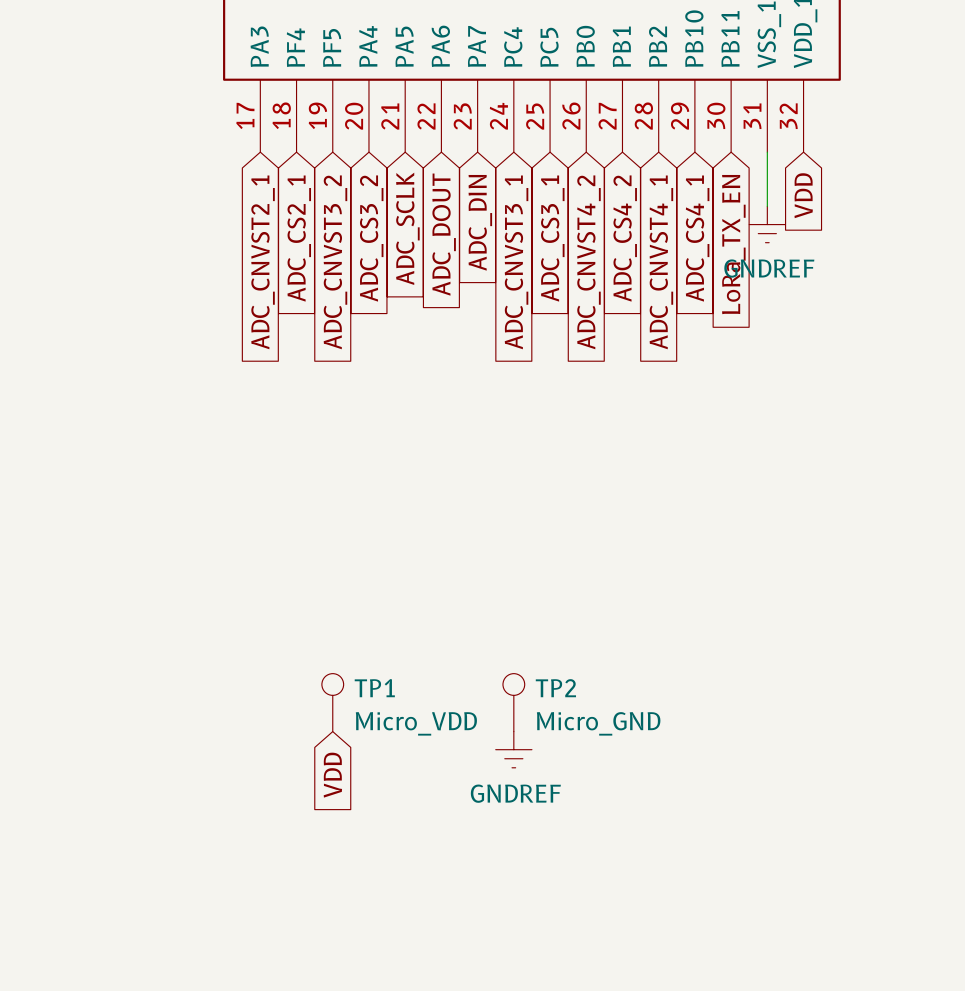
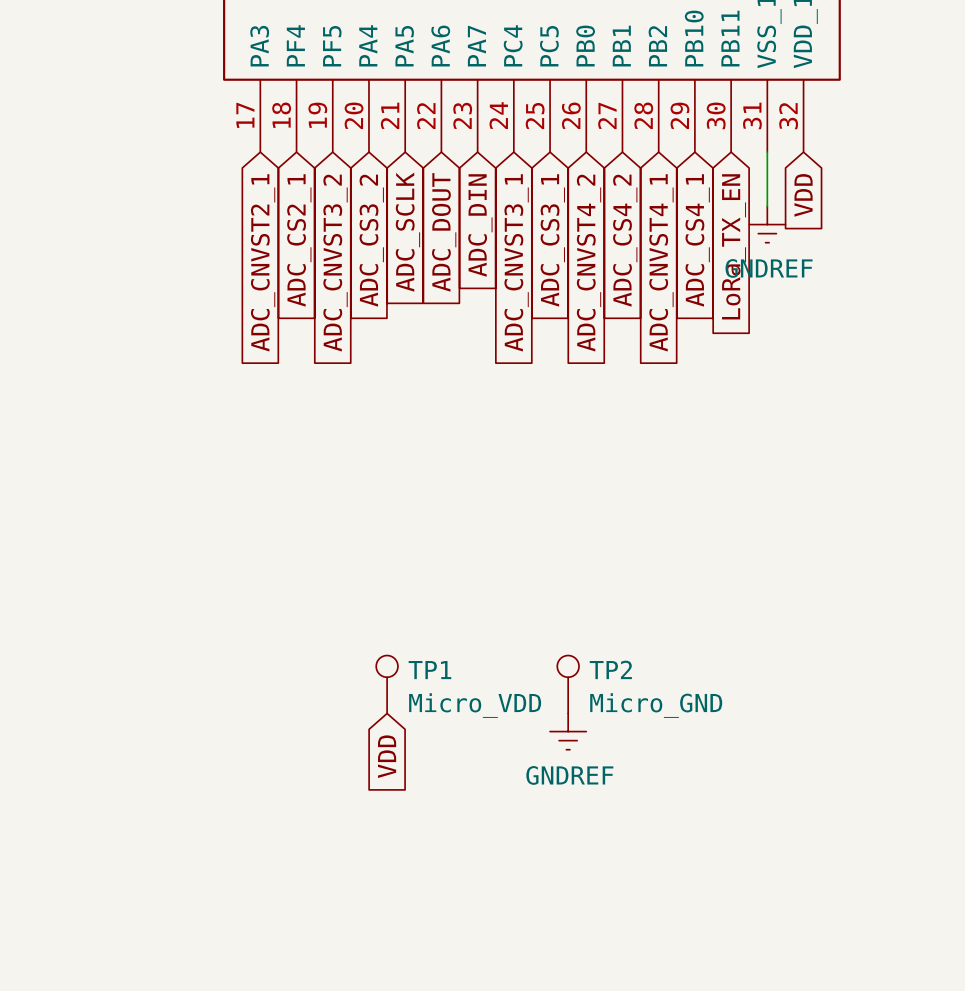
TP1 position: (332, 702) -> (387, 684)
TP2 position: (513, 702) -> (568, 684)
power symbol position: GNDREF (513, 749) -> GNDREF (568, 731)
global label position: VDD (332, 775) -> VDD (387, 756)

